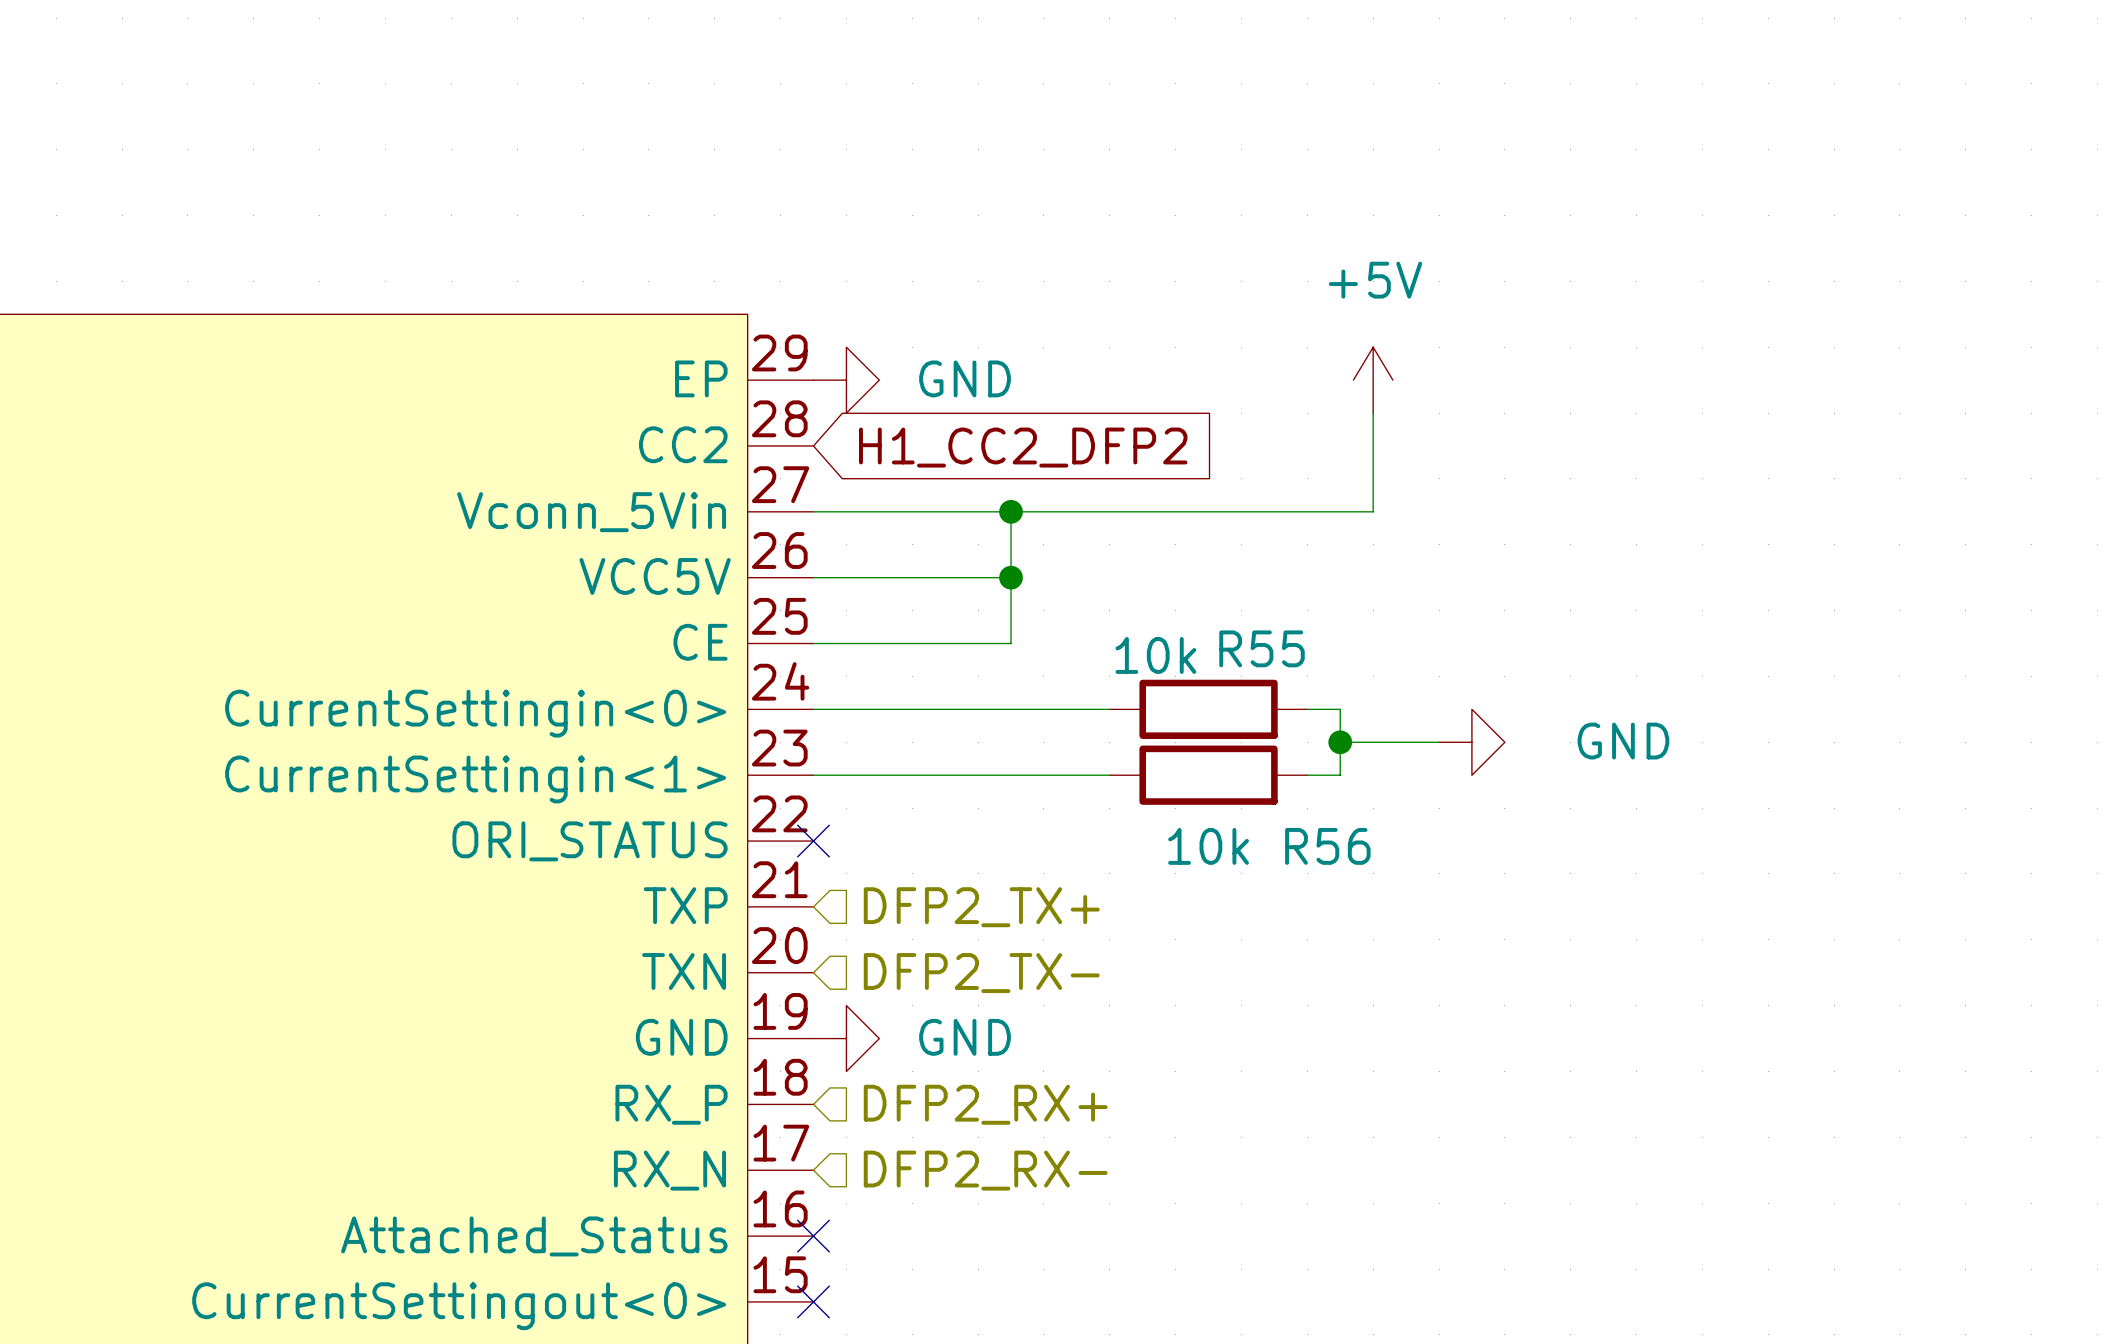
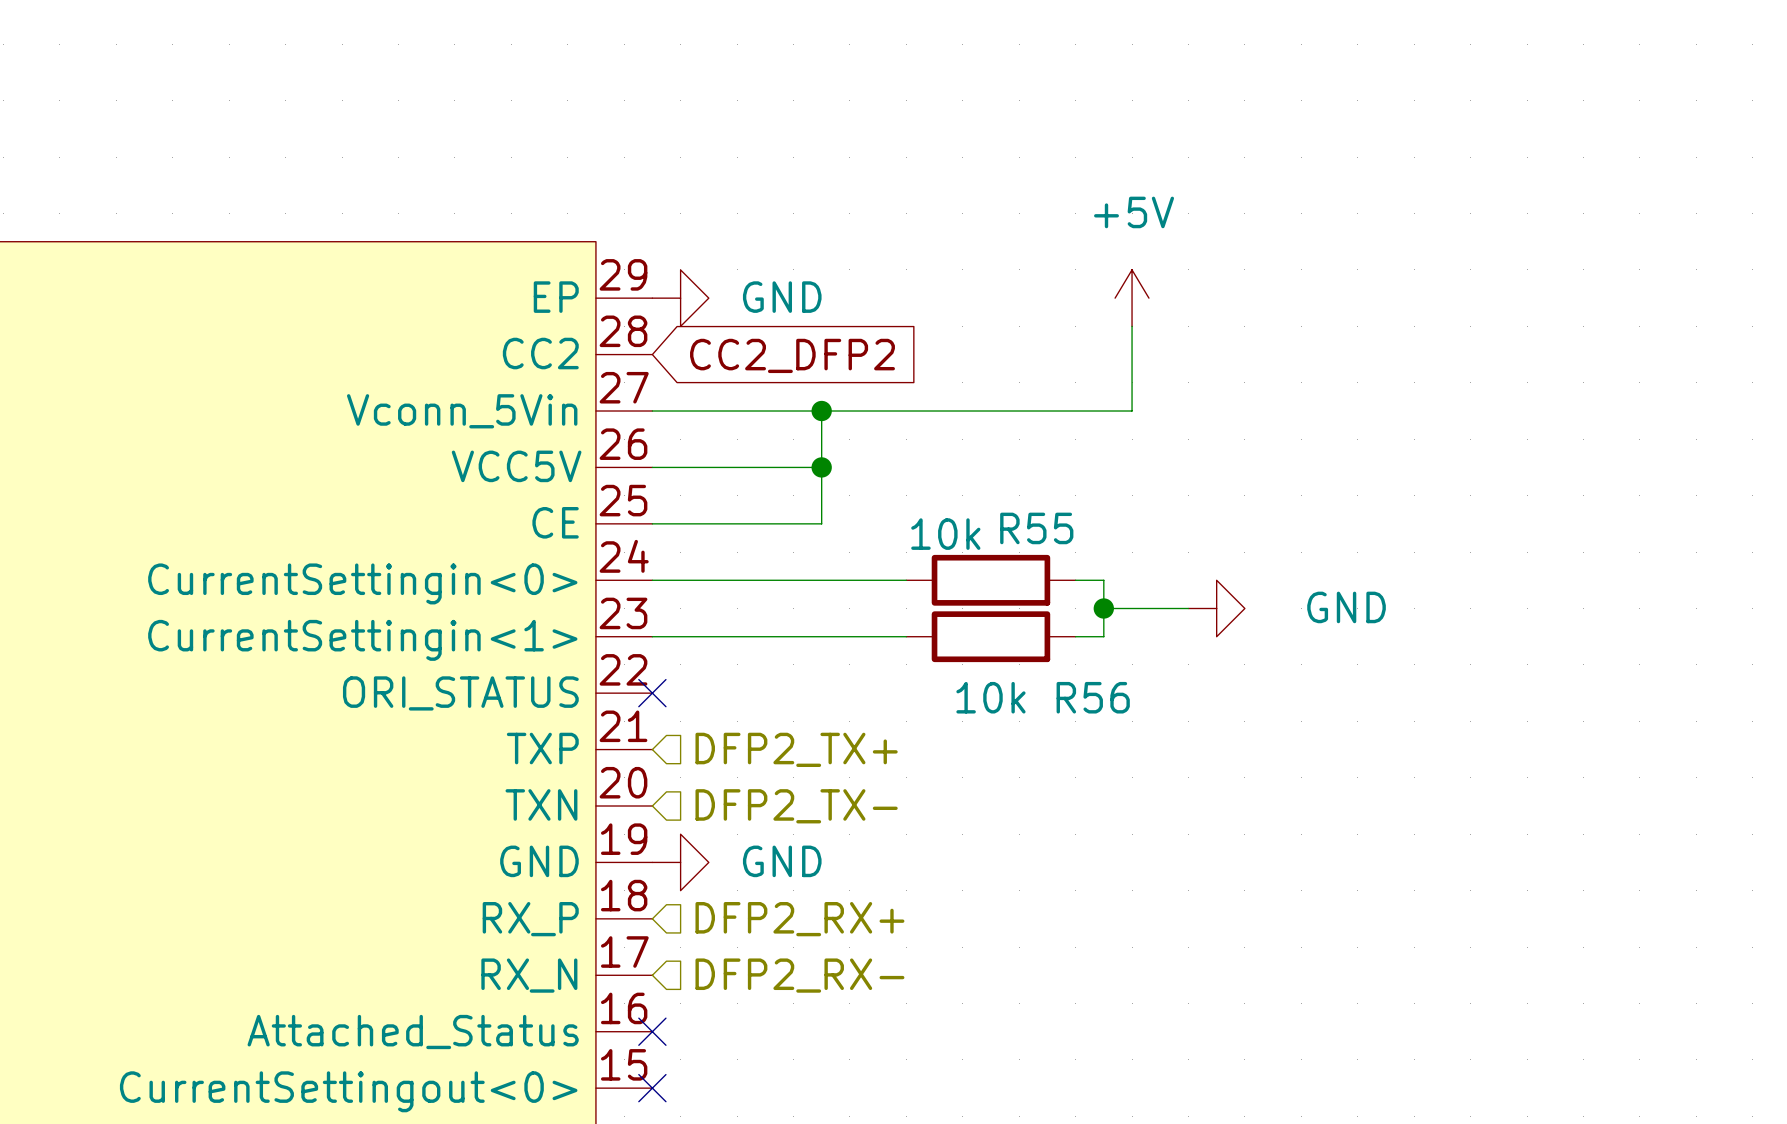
global label: H1_CC2_DFP2 (1023, 447) -> CC2_DFP2 (792, 355)

